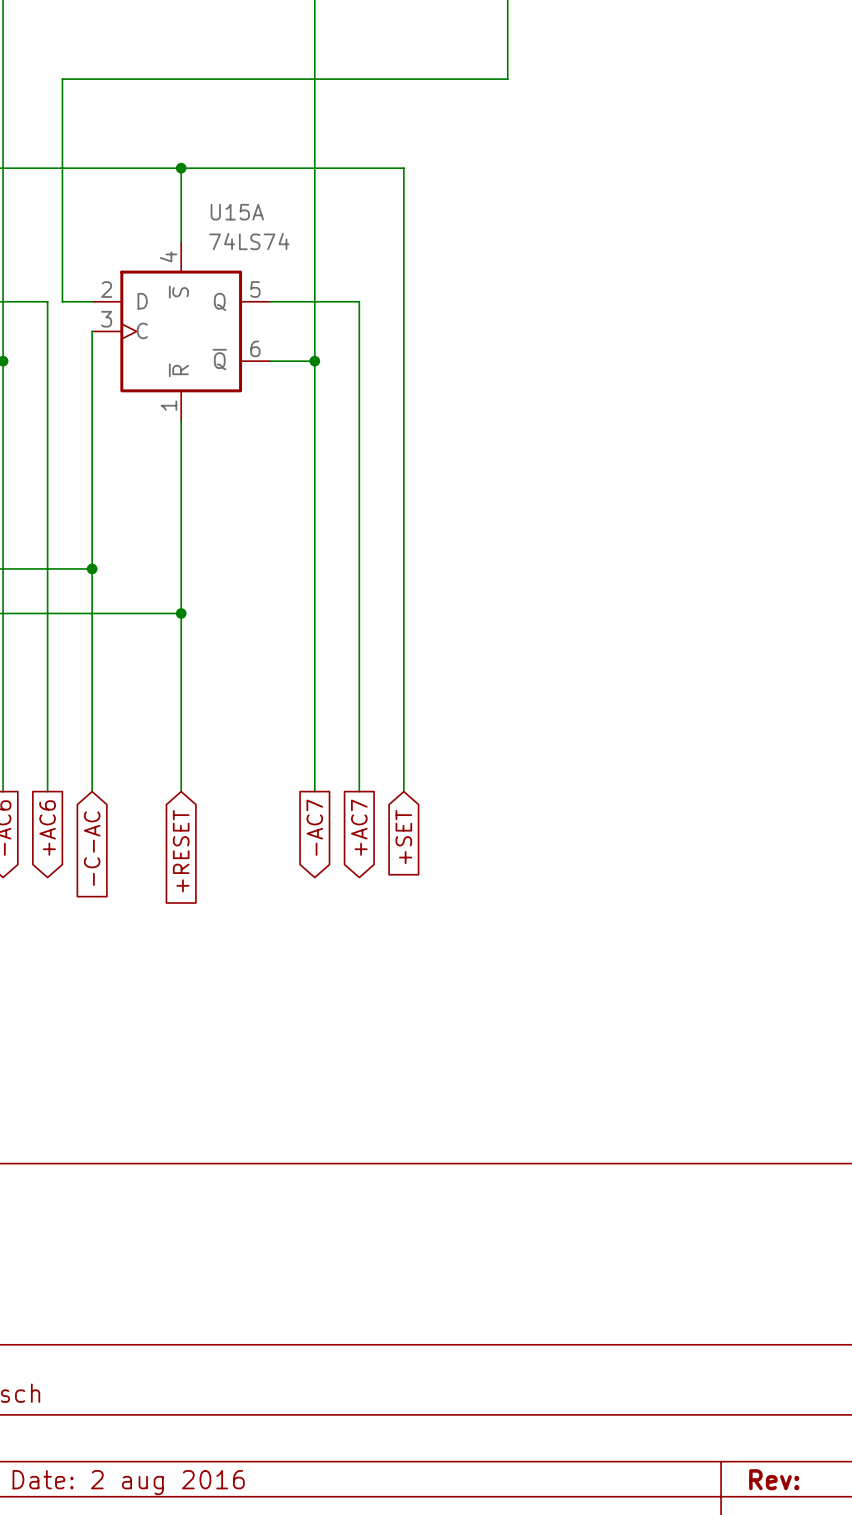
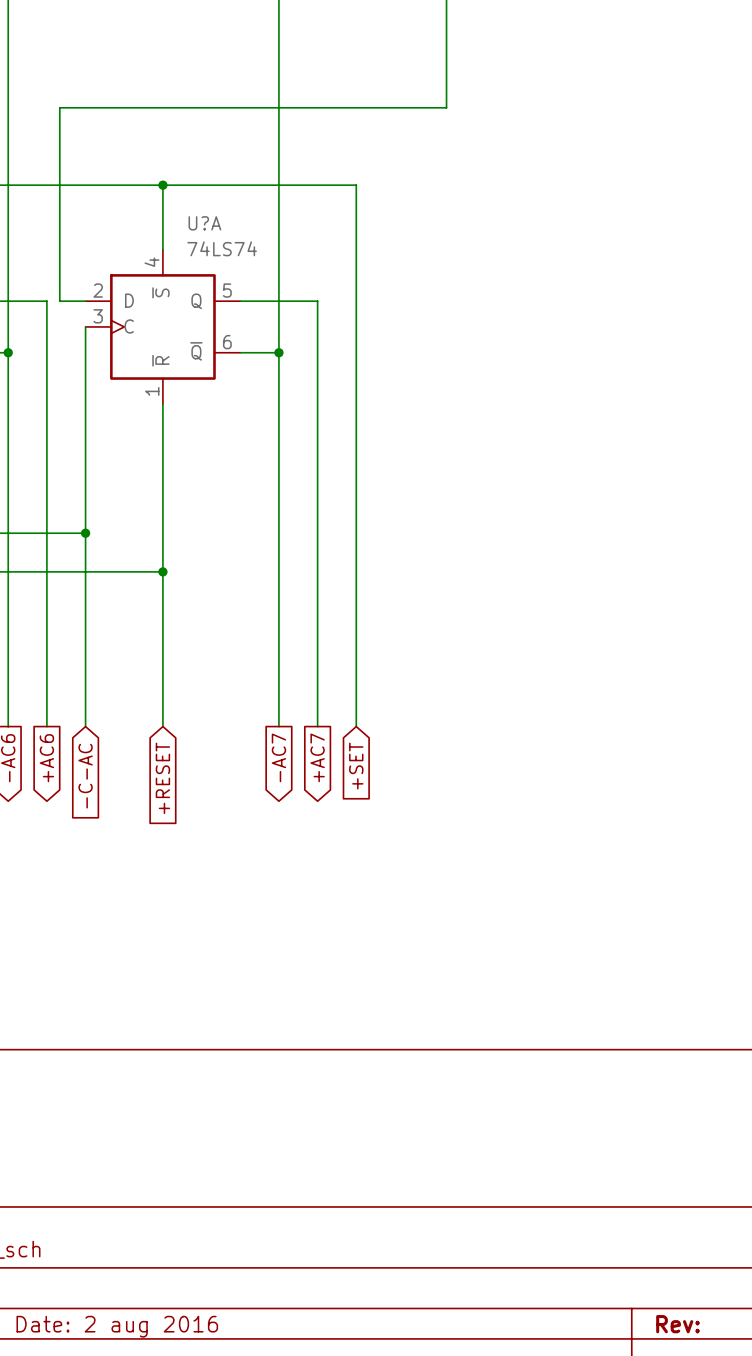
U15A name: U15A (237, 212) -> U?A (204, 223)

